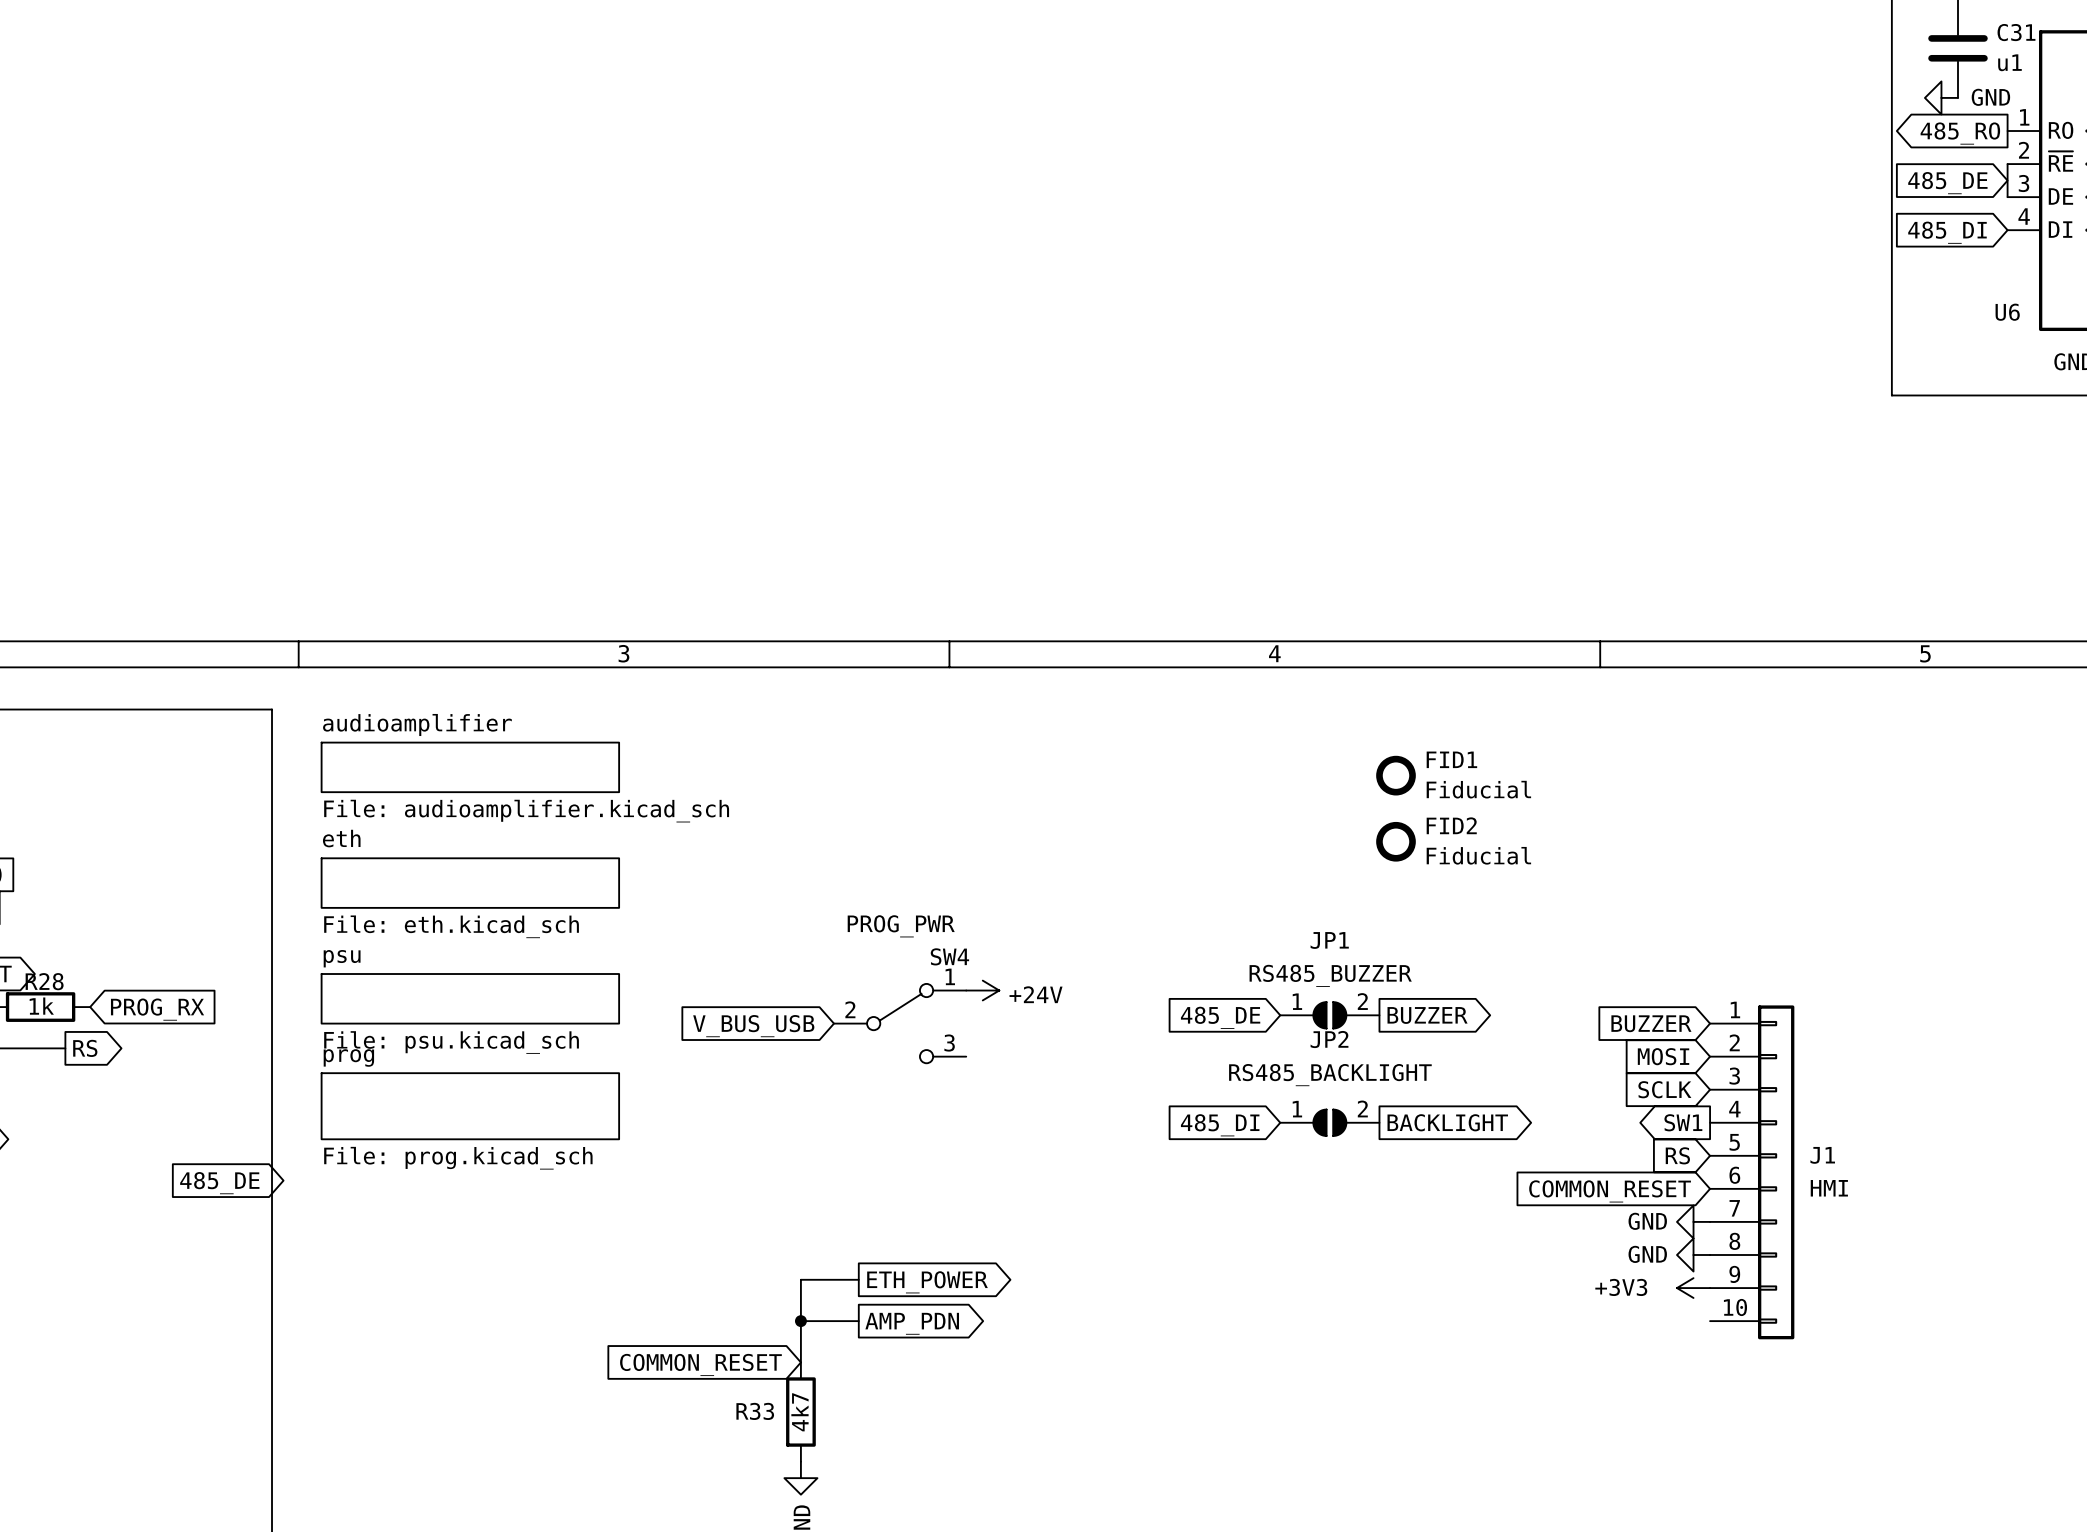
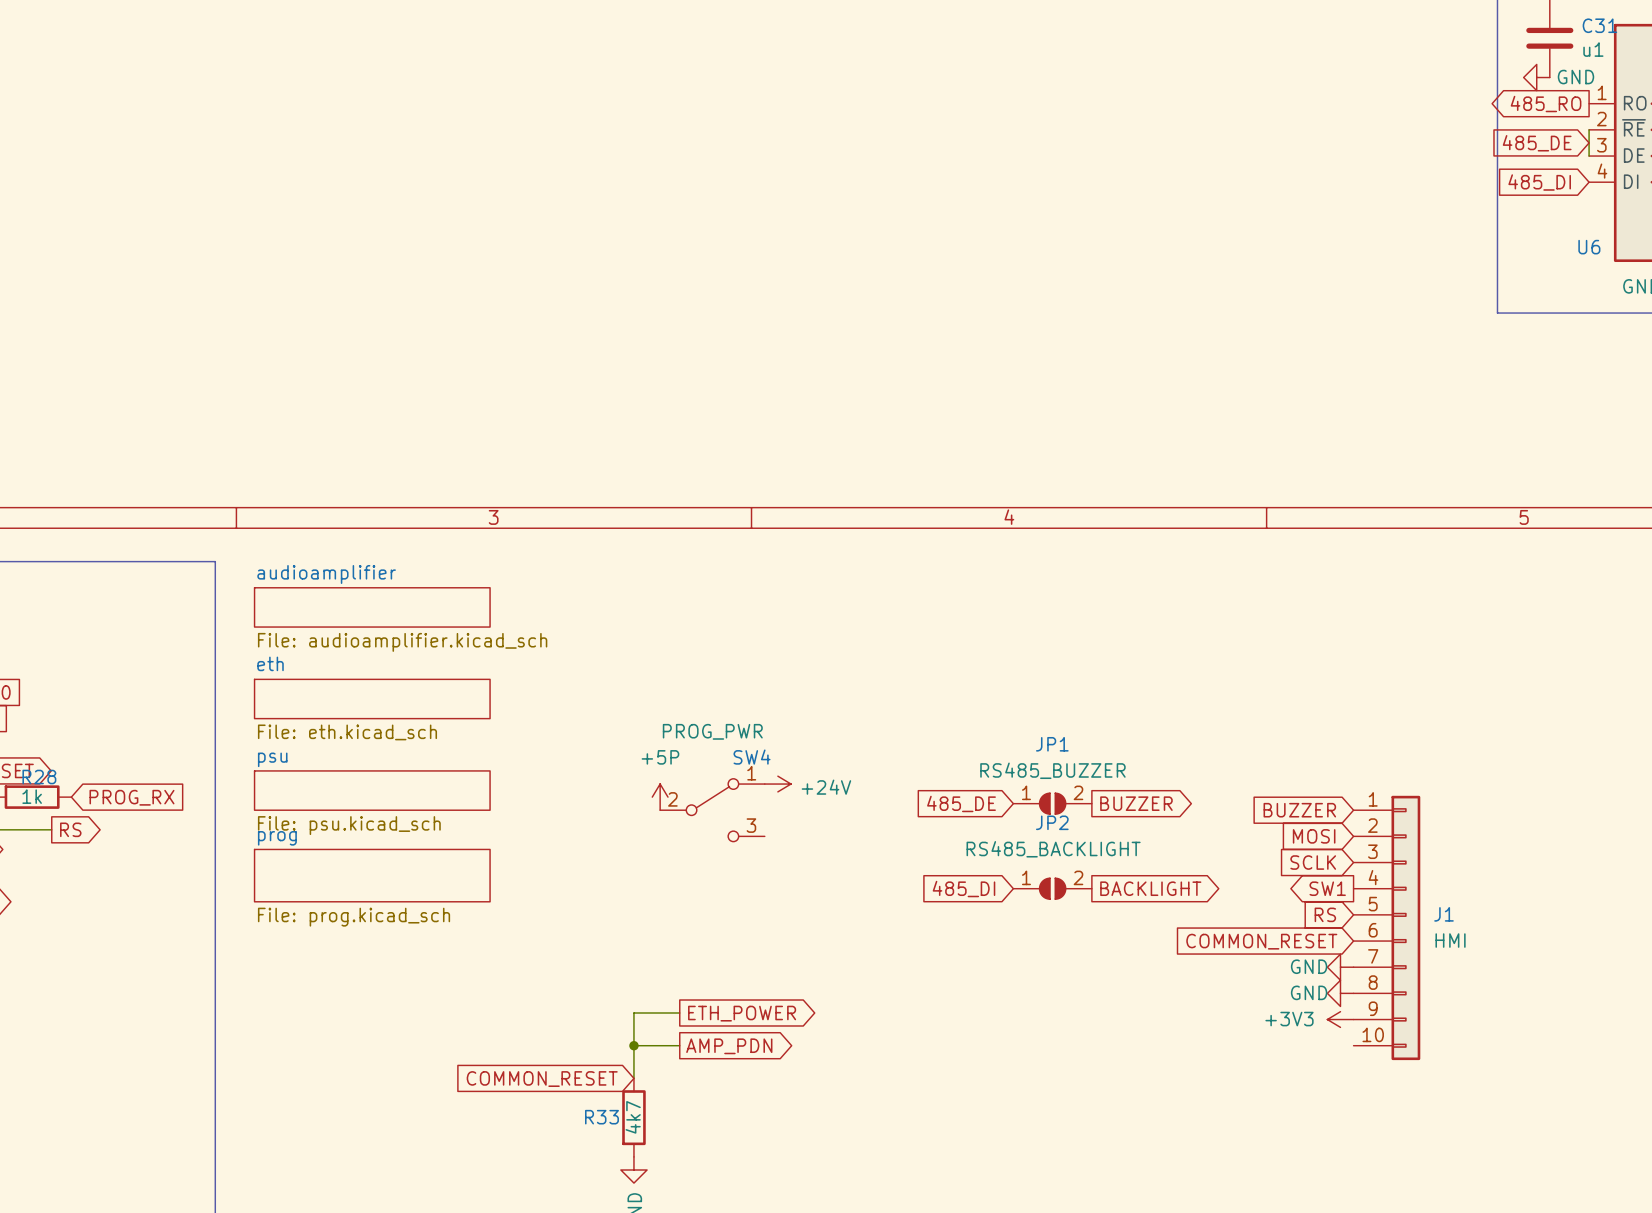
FID1: Fiducial (1396, 775) -> none
FID2: Fiducial (1396, 841) -> none
power symbol: none -> +5P (660, 797)
global label: V_BUS_USB (753, 1026) -> none
global label: 485_DE (219, 1183) -> none

